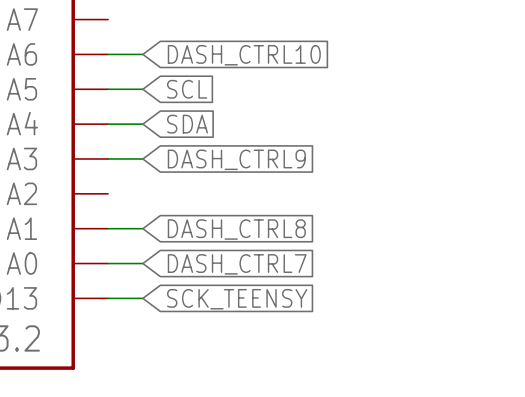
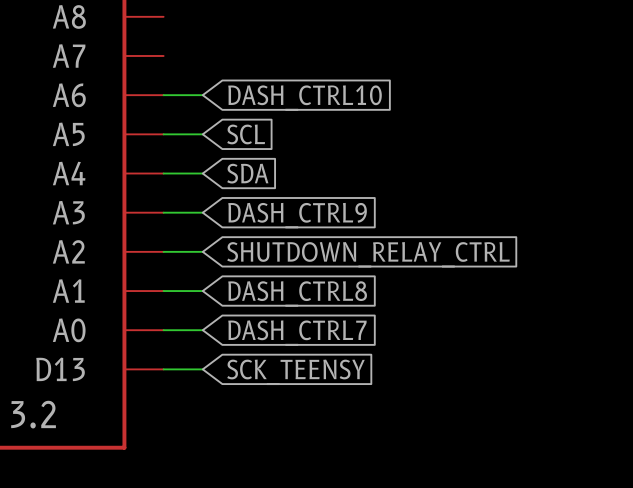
wire: none -> (163, 251) (202, 251)
global label: none -> SHUTDOWN_RELAY_CTRL (368, 254)

